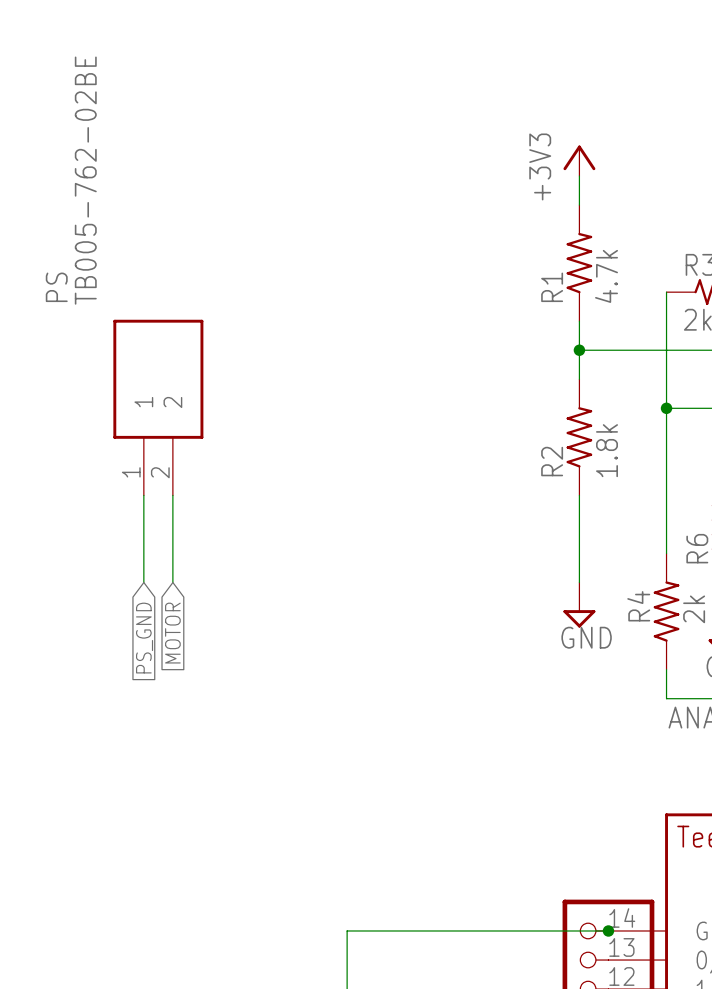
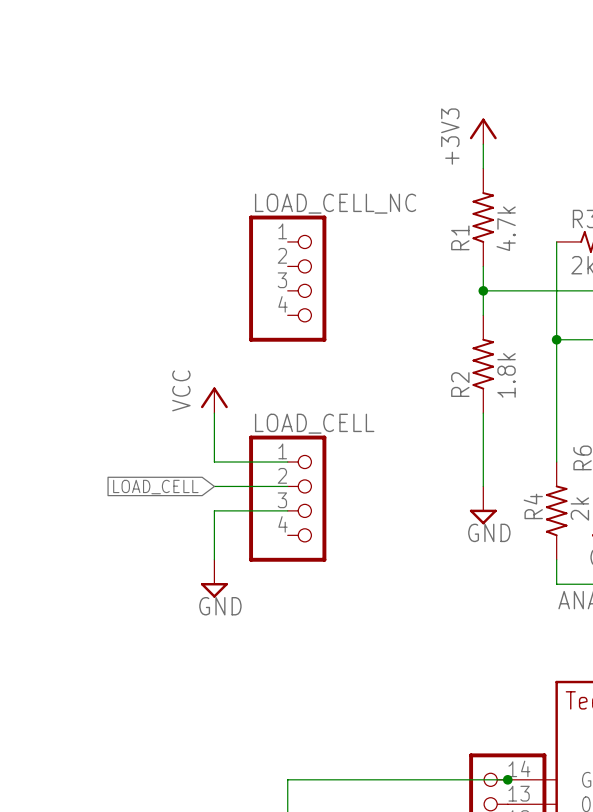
LOAD_CELL_NC: none -> (287, 278)
PS: TB005-762-02BE (158, 407) -> none
power symbol: none -> VCC (214, 400)
wire: (143, 495) (143, 582) -> none
wire: (172, 495) (172, 582) -> none
wire: none -> (214, 413) (214, 462) (287, 462)
wire: none -> (214, 486) (287, 486)
global label: none -> LOAD_CELL (155, 487)
LOAD_CELL: none -> (287, 498)
wire: none -> (287, 510) (214, 510) (214, 559)
global label: MOTOR (172, 633) -> none
global label: PS_GND (144, 638) -> none
power symbol: none -> GND (214, 578)

